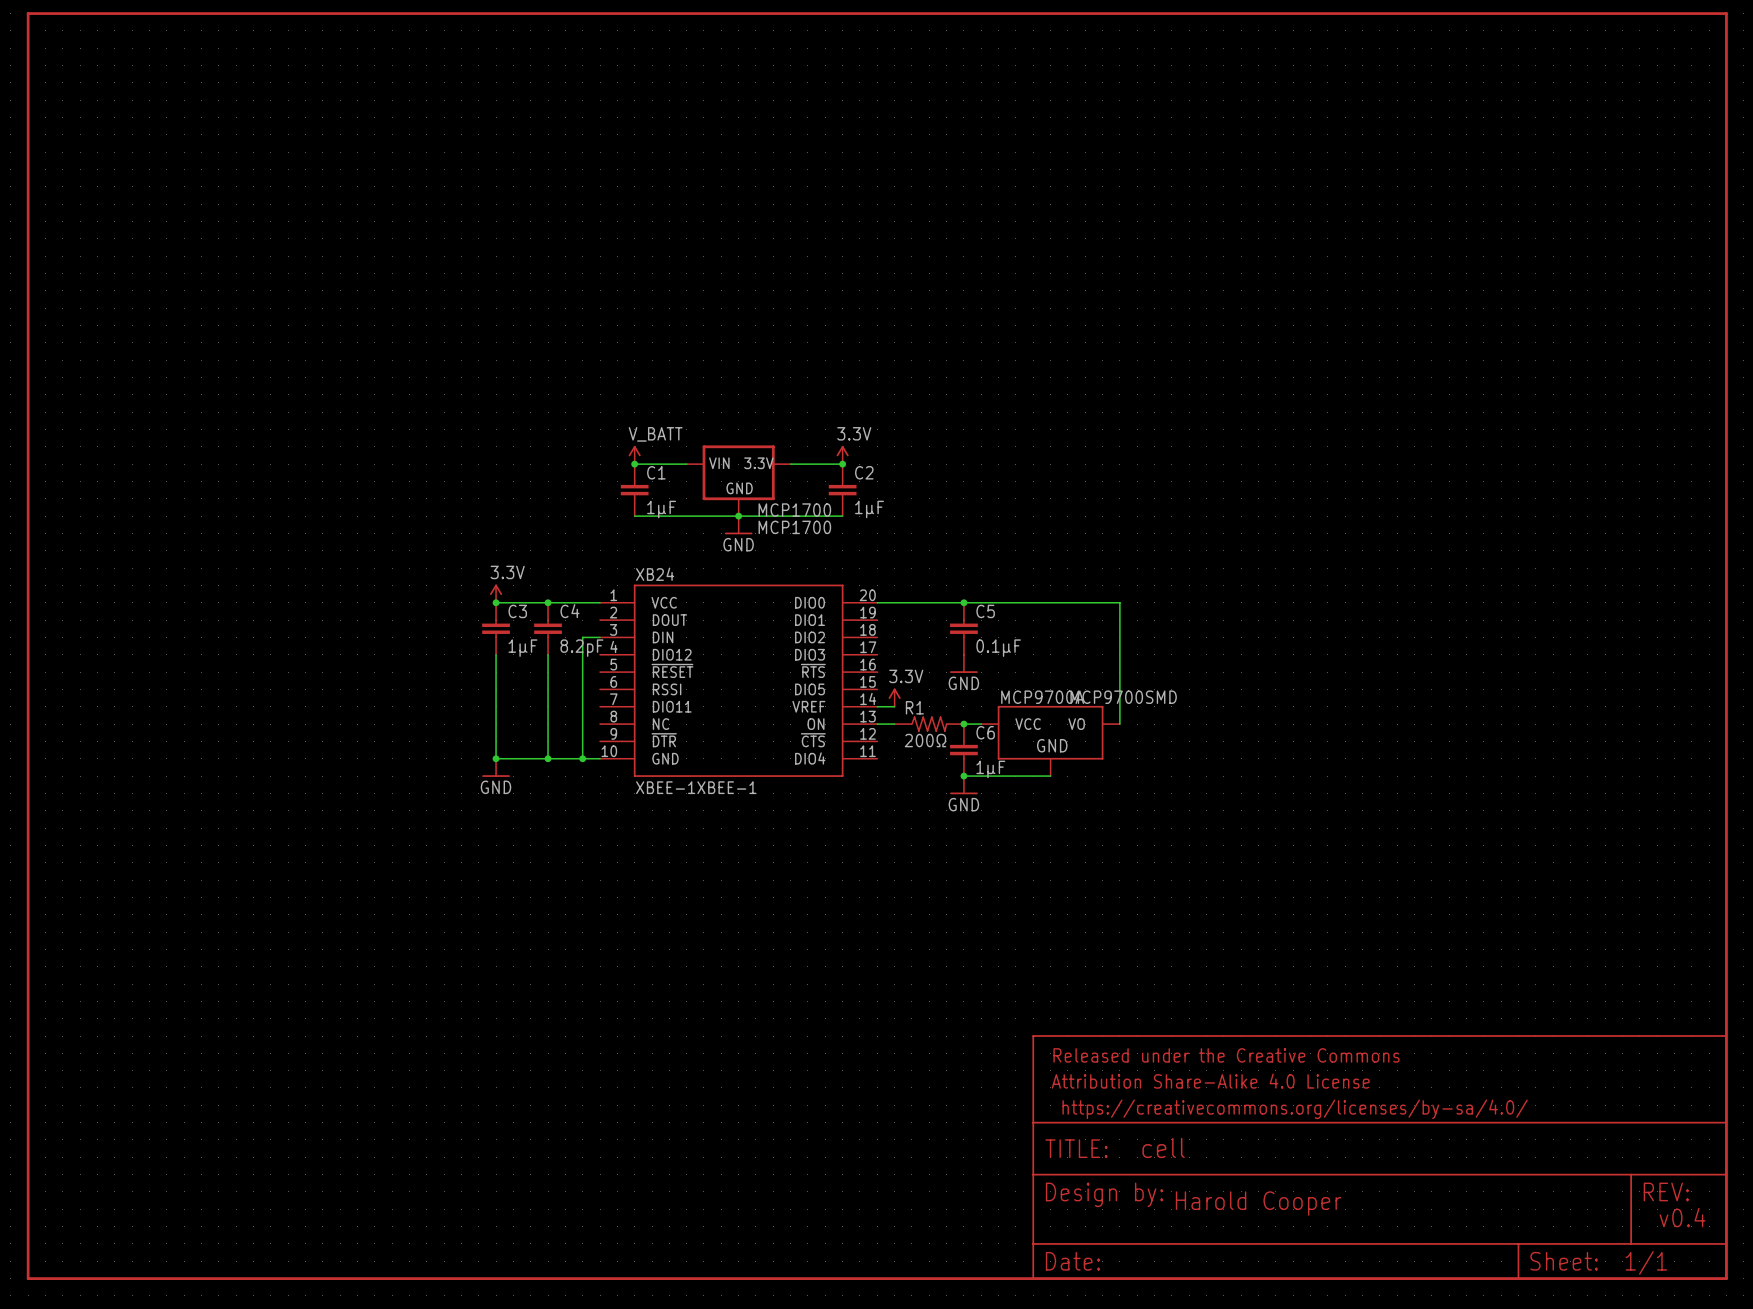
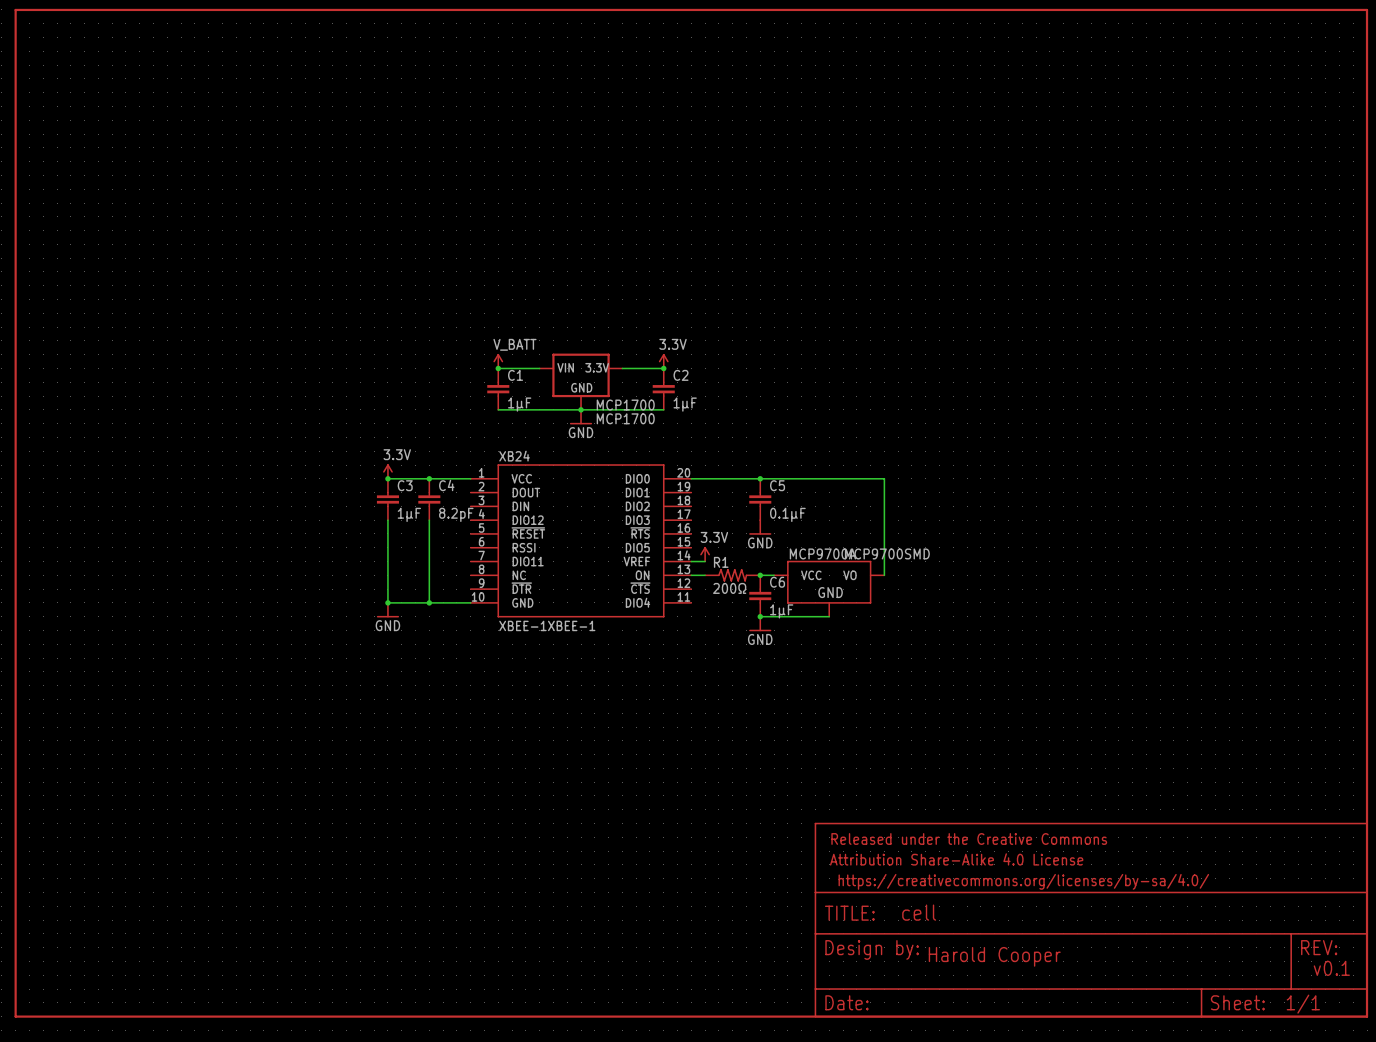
wire: (600, 637) (582, 637) (582, 758) -> none
junction: (582, 758) -> none
text: v0.4 (1682, 1217) -> v0.1 (1331, 968)

